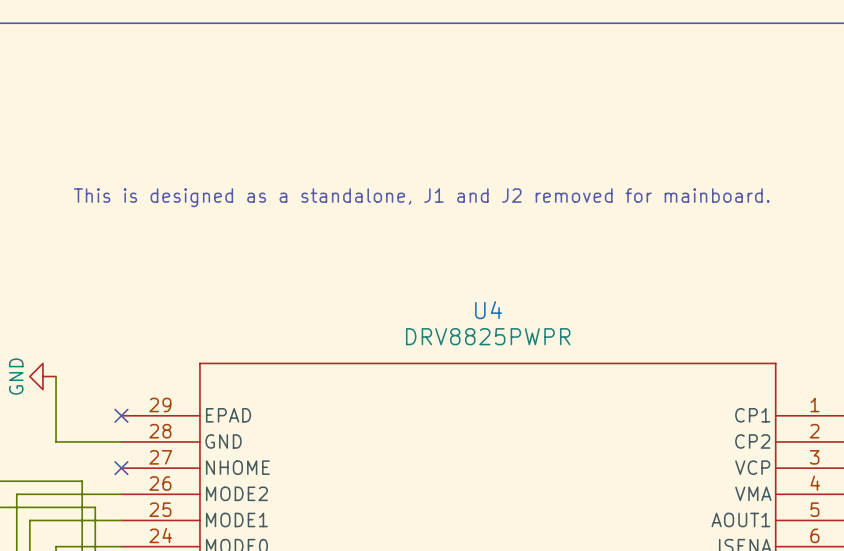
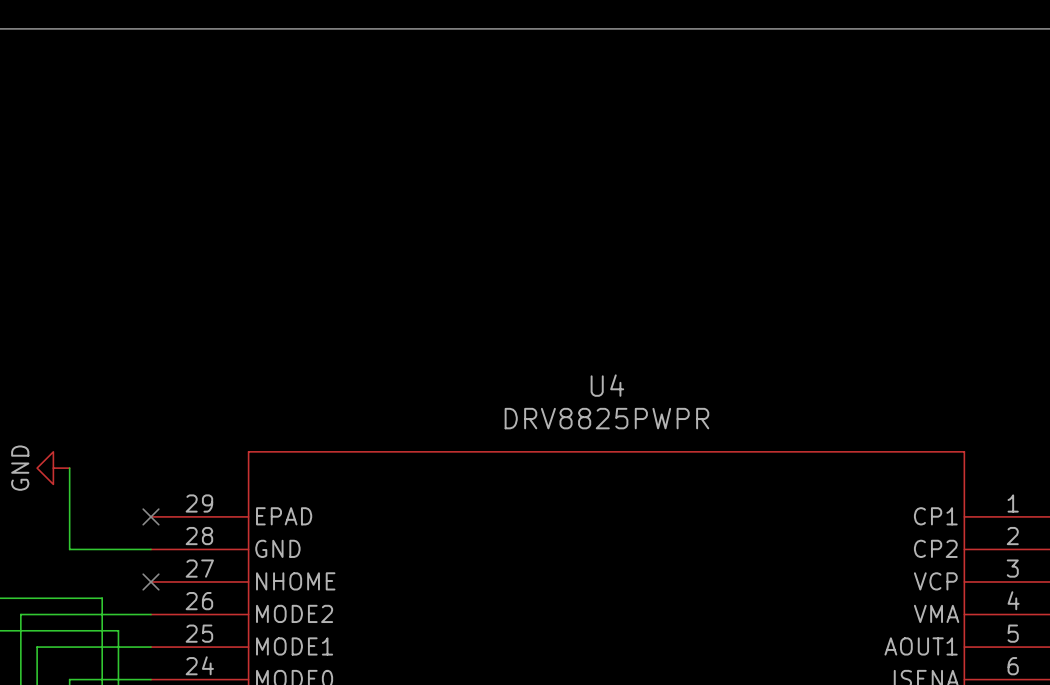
text: This is designed as a standalone, J1 and J2 removed for mainboard. (421, 197) -> none

